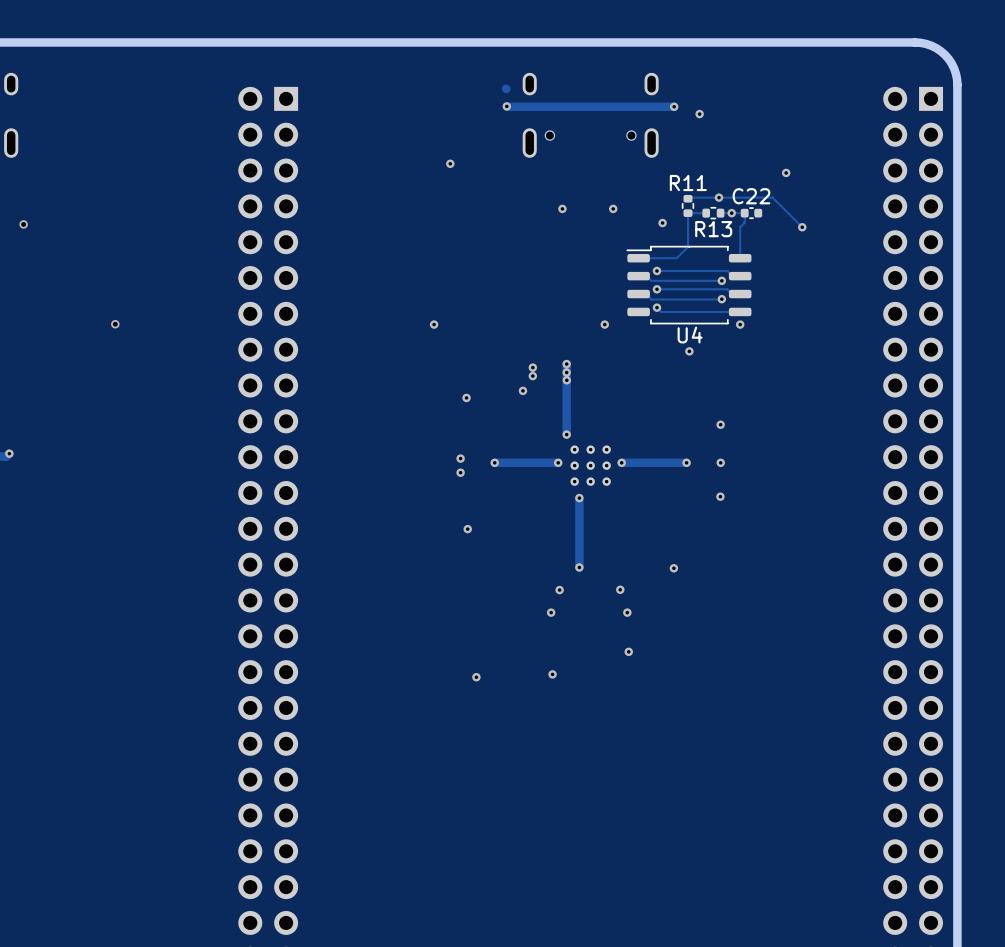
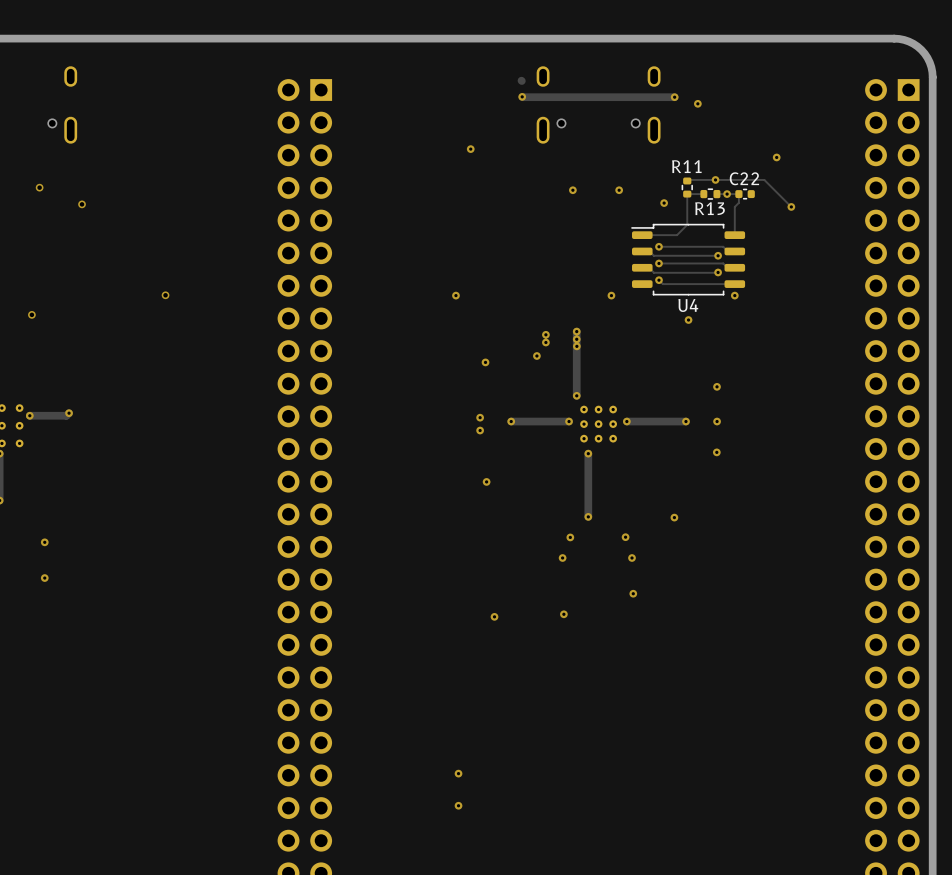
via: none -> (458, 773)
via: none -> (458, 805)

